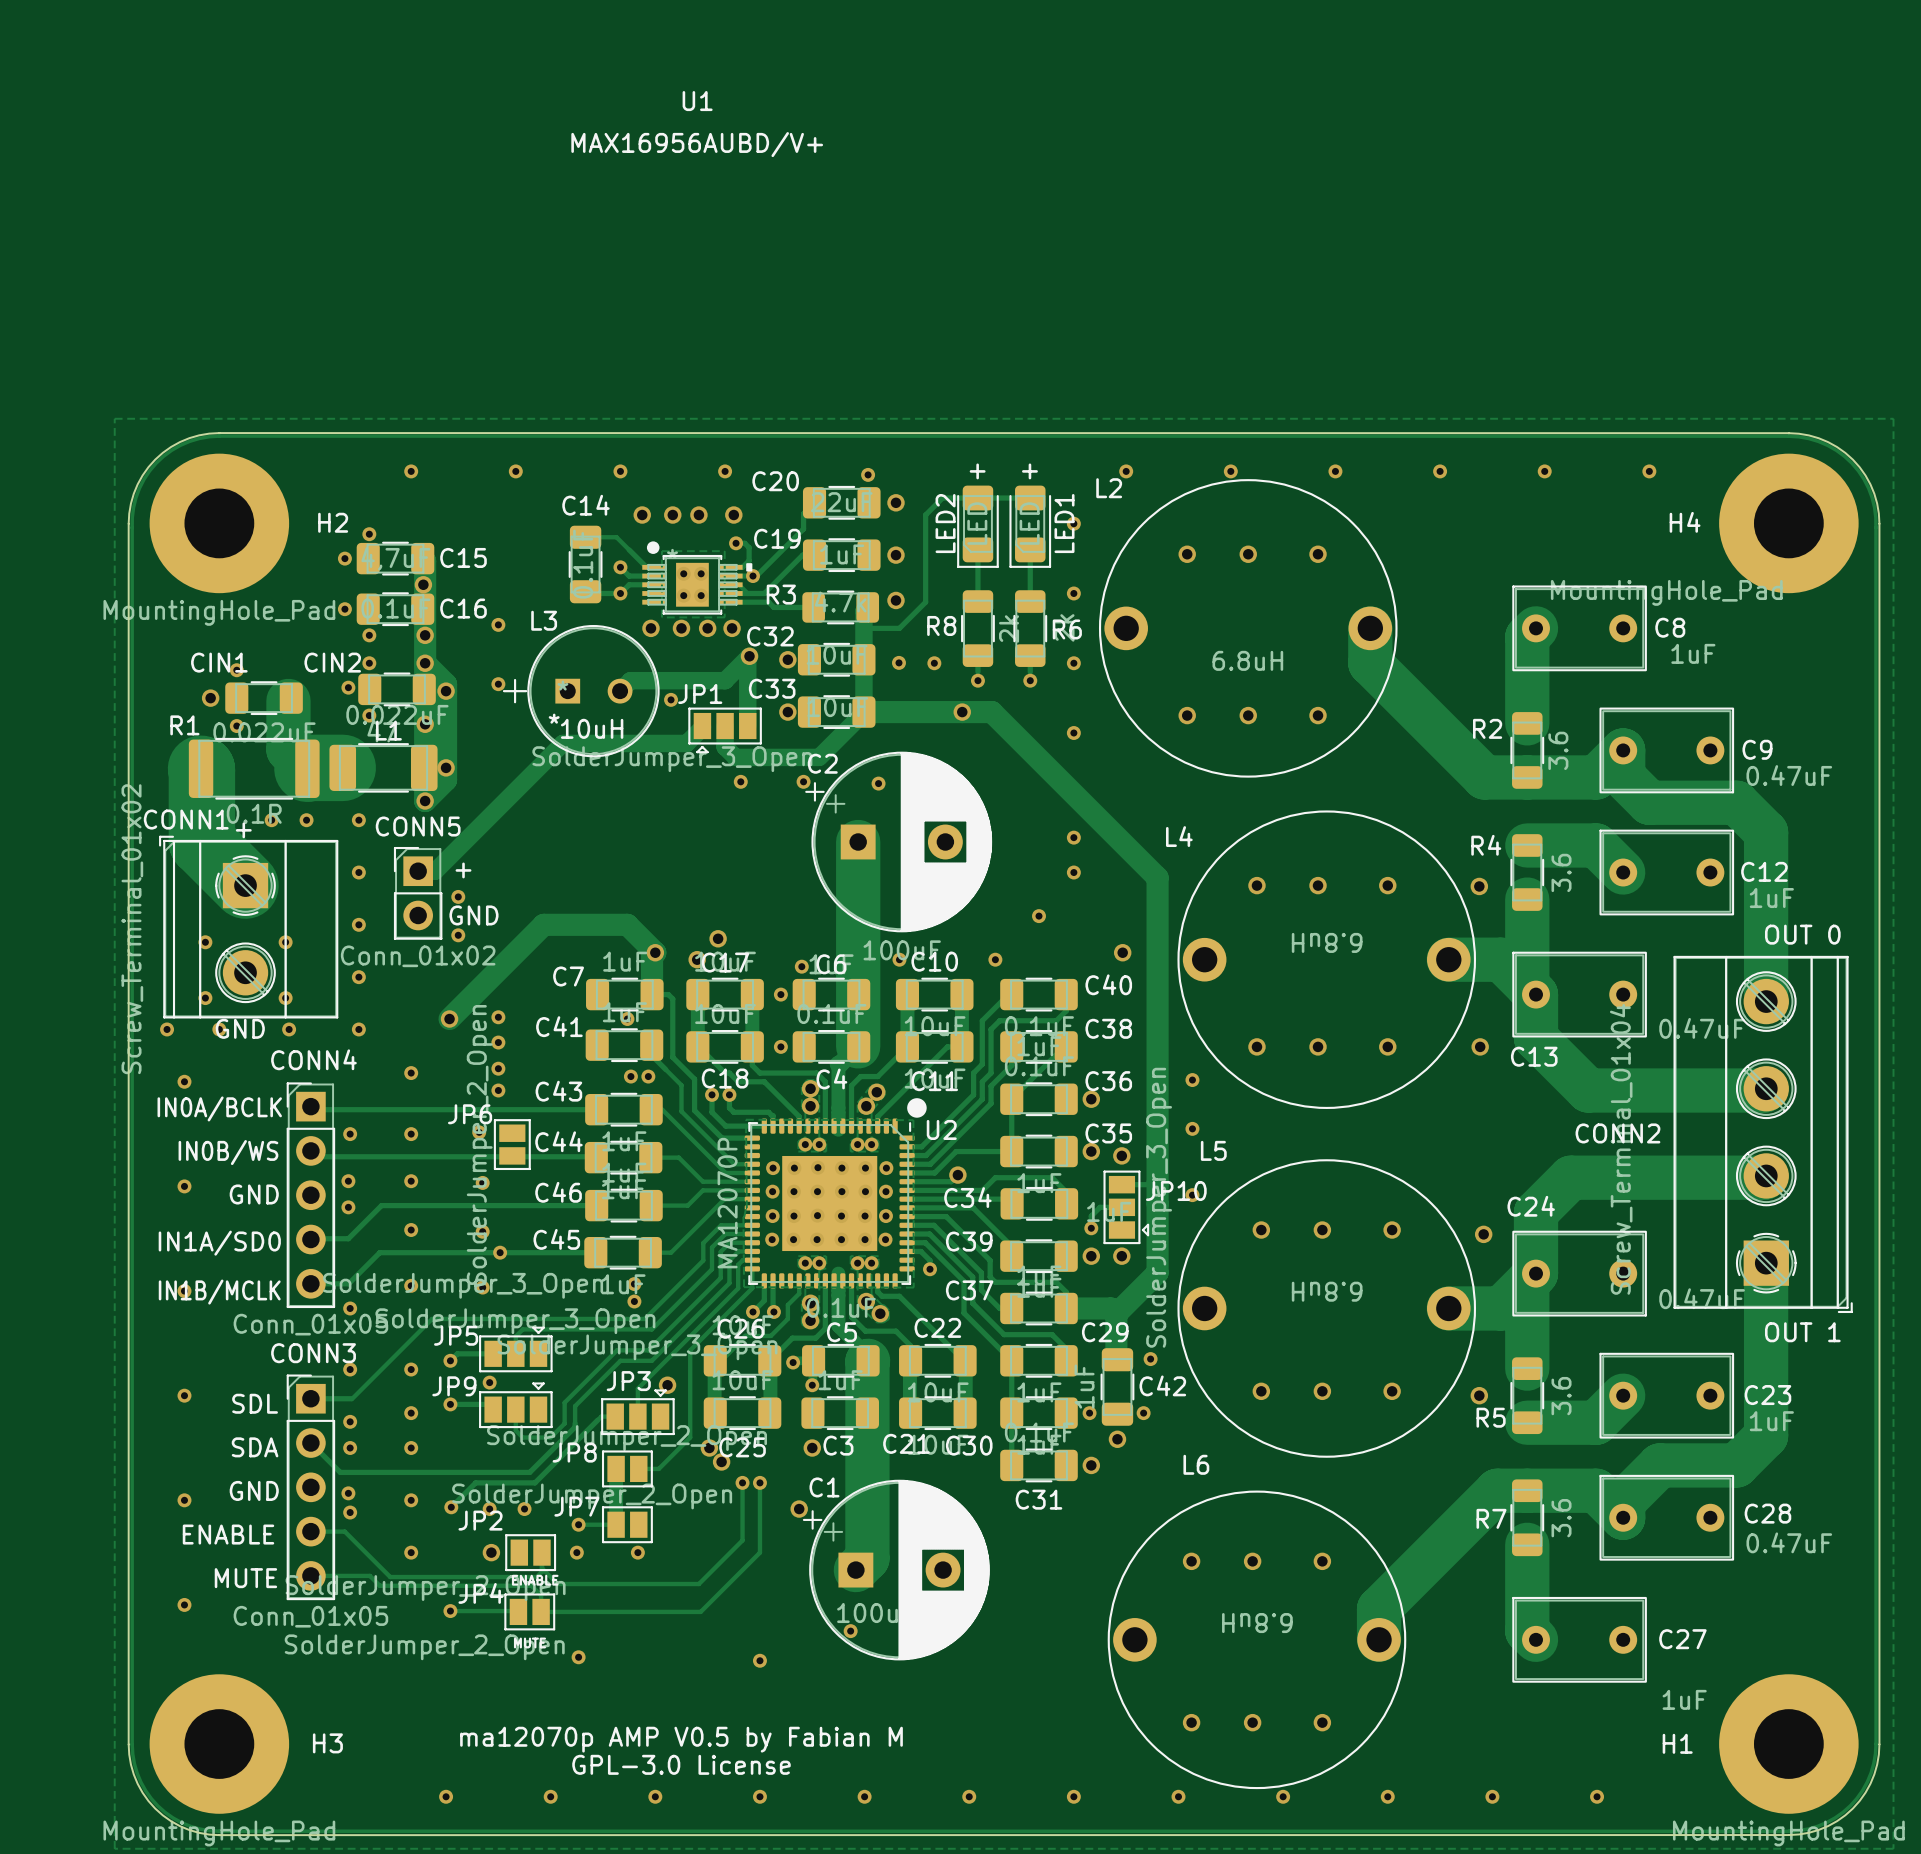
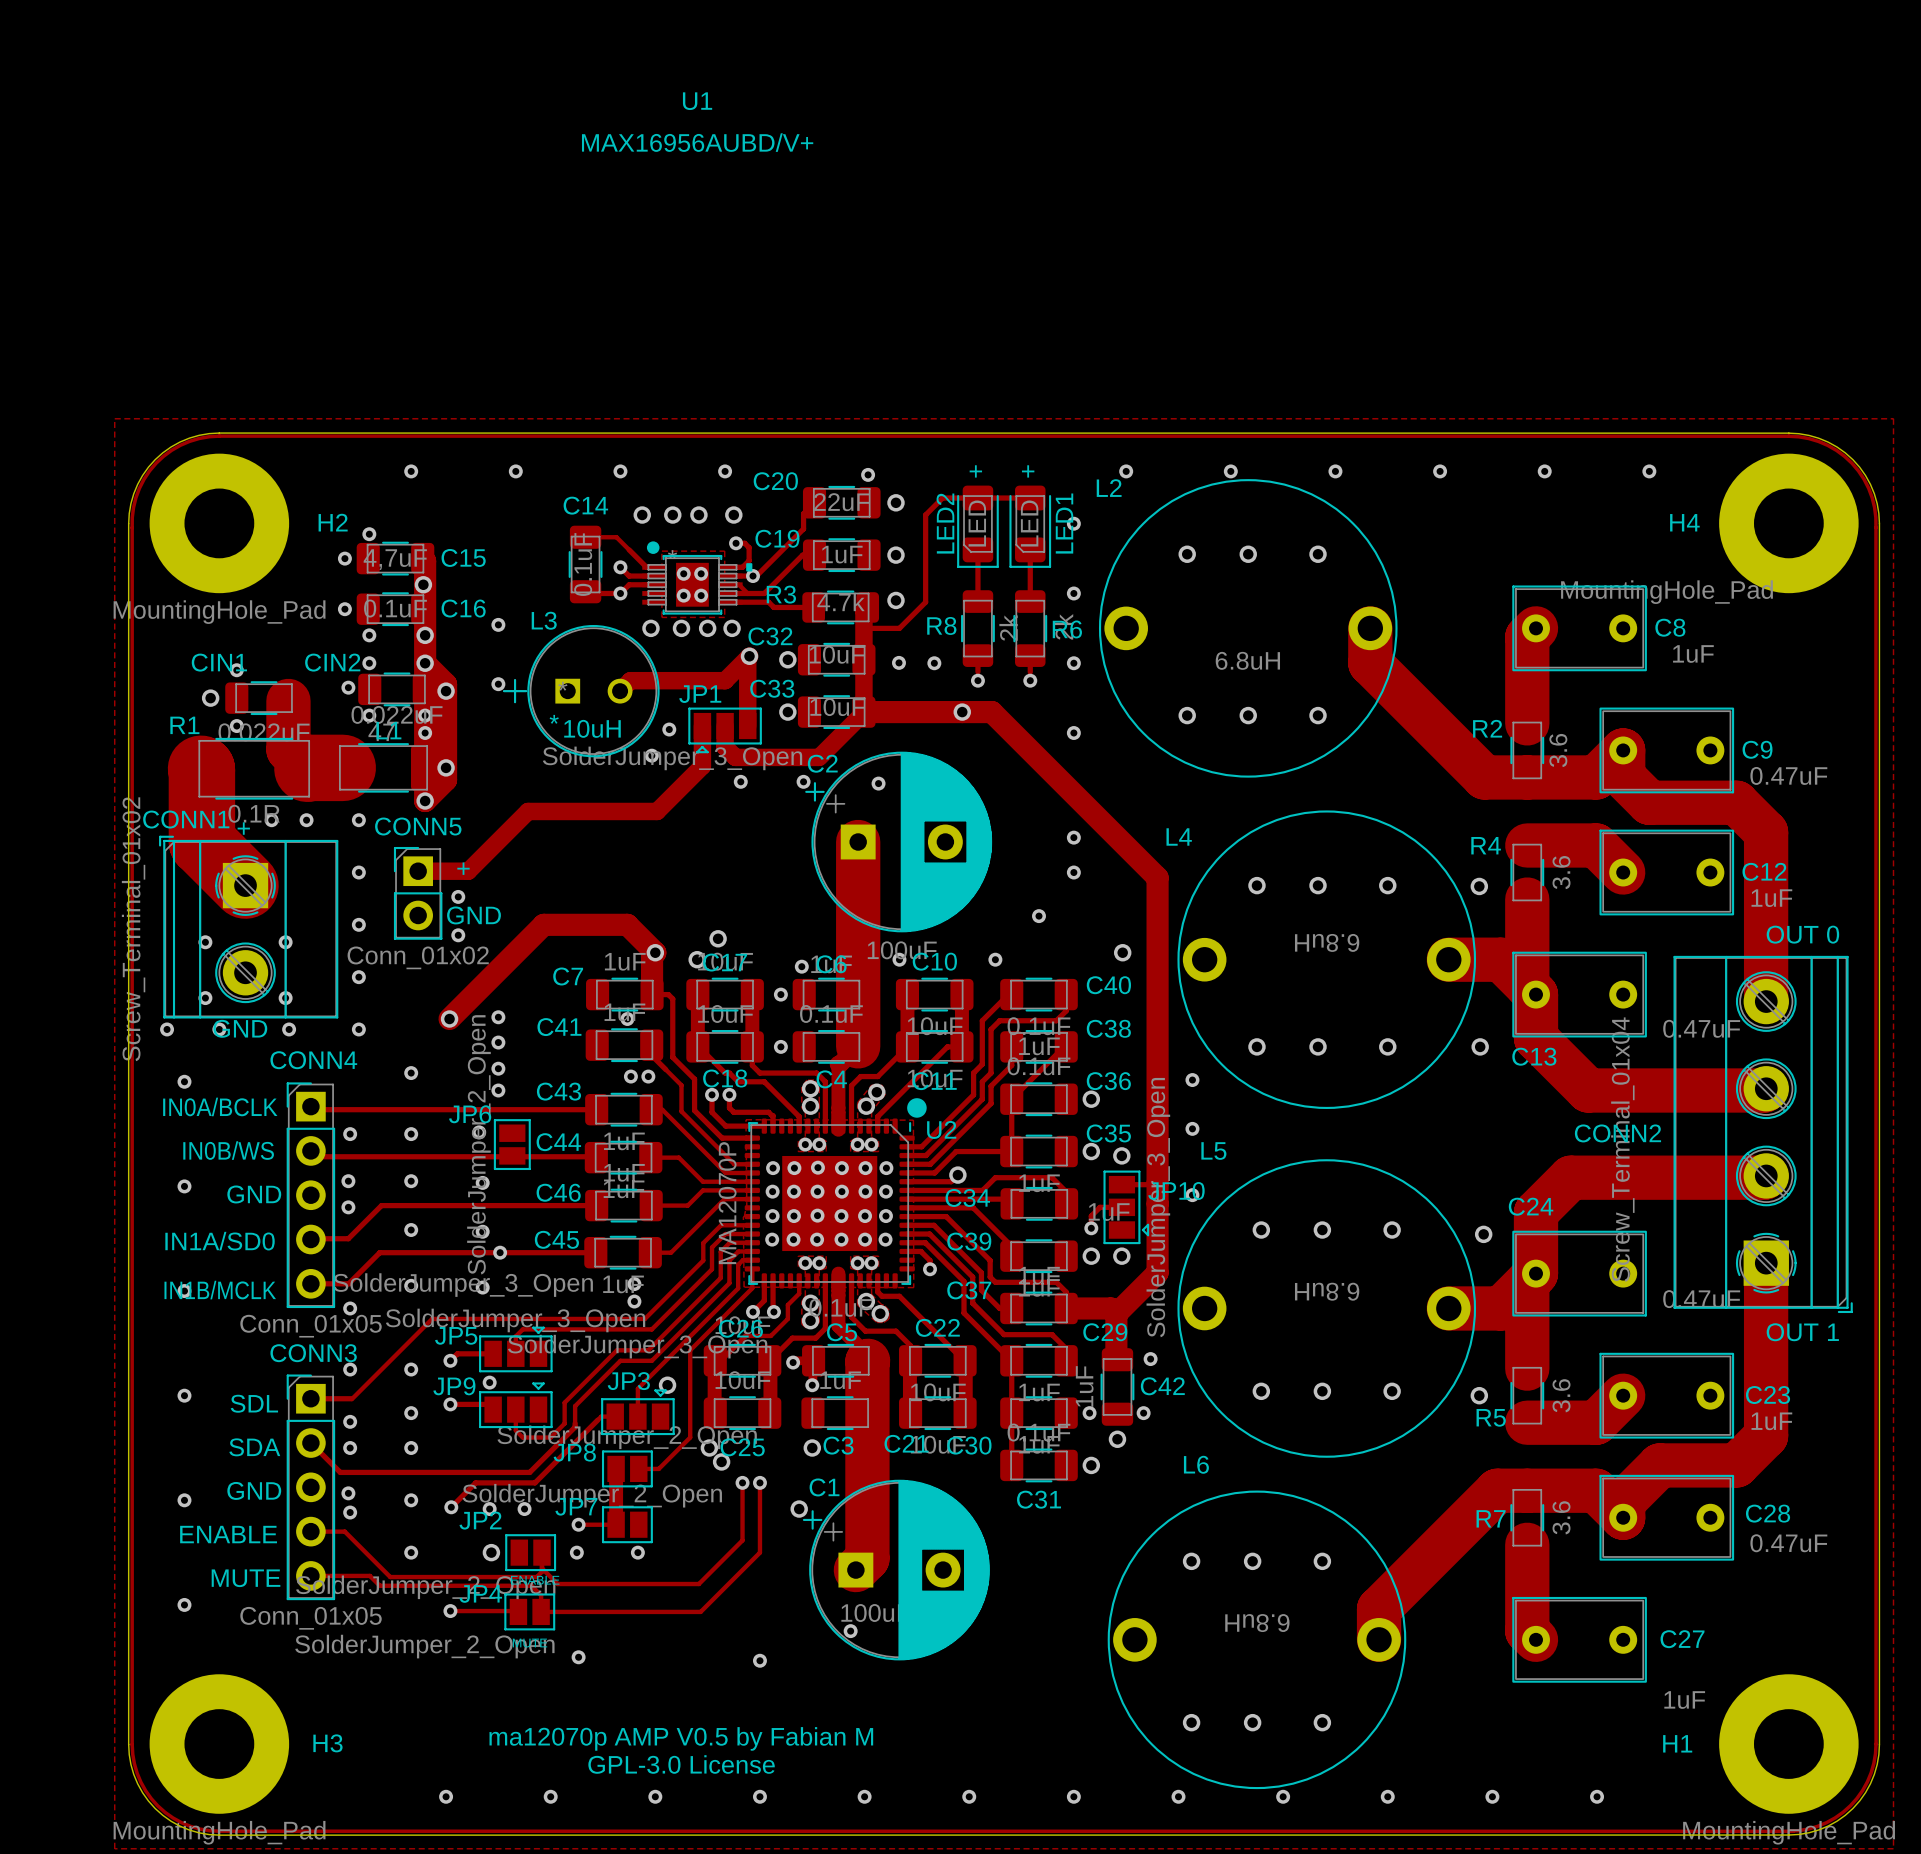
via: (671, 699) -> none
via: none -> (425, 715)
via: (425, 724) -> none
track: (702, 727) (686, 743) (562, 743) (435, 871) -> (702, 727) (702, 766) (657, 811) (528, 811) (468, 871) (435, 871)
via: none -> (669, 729)
via: none -> (425, 733)
via: none -> (651, 755)

